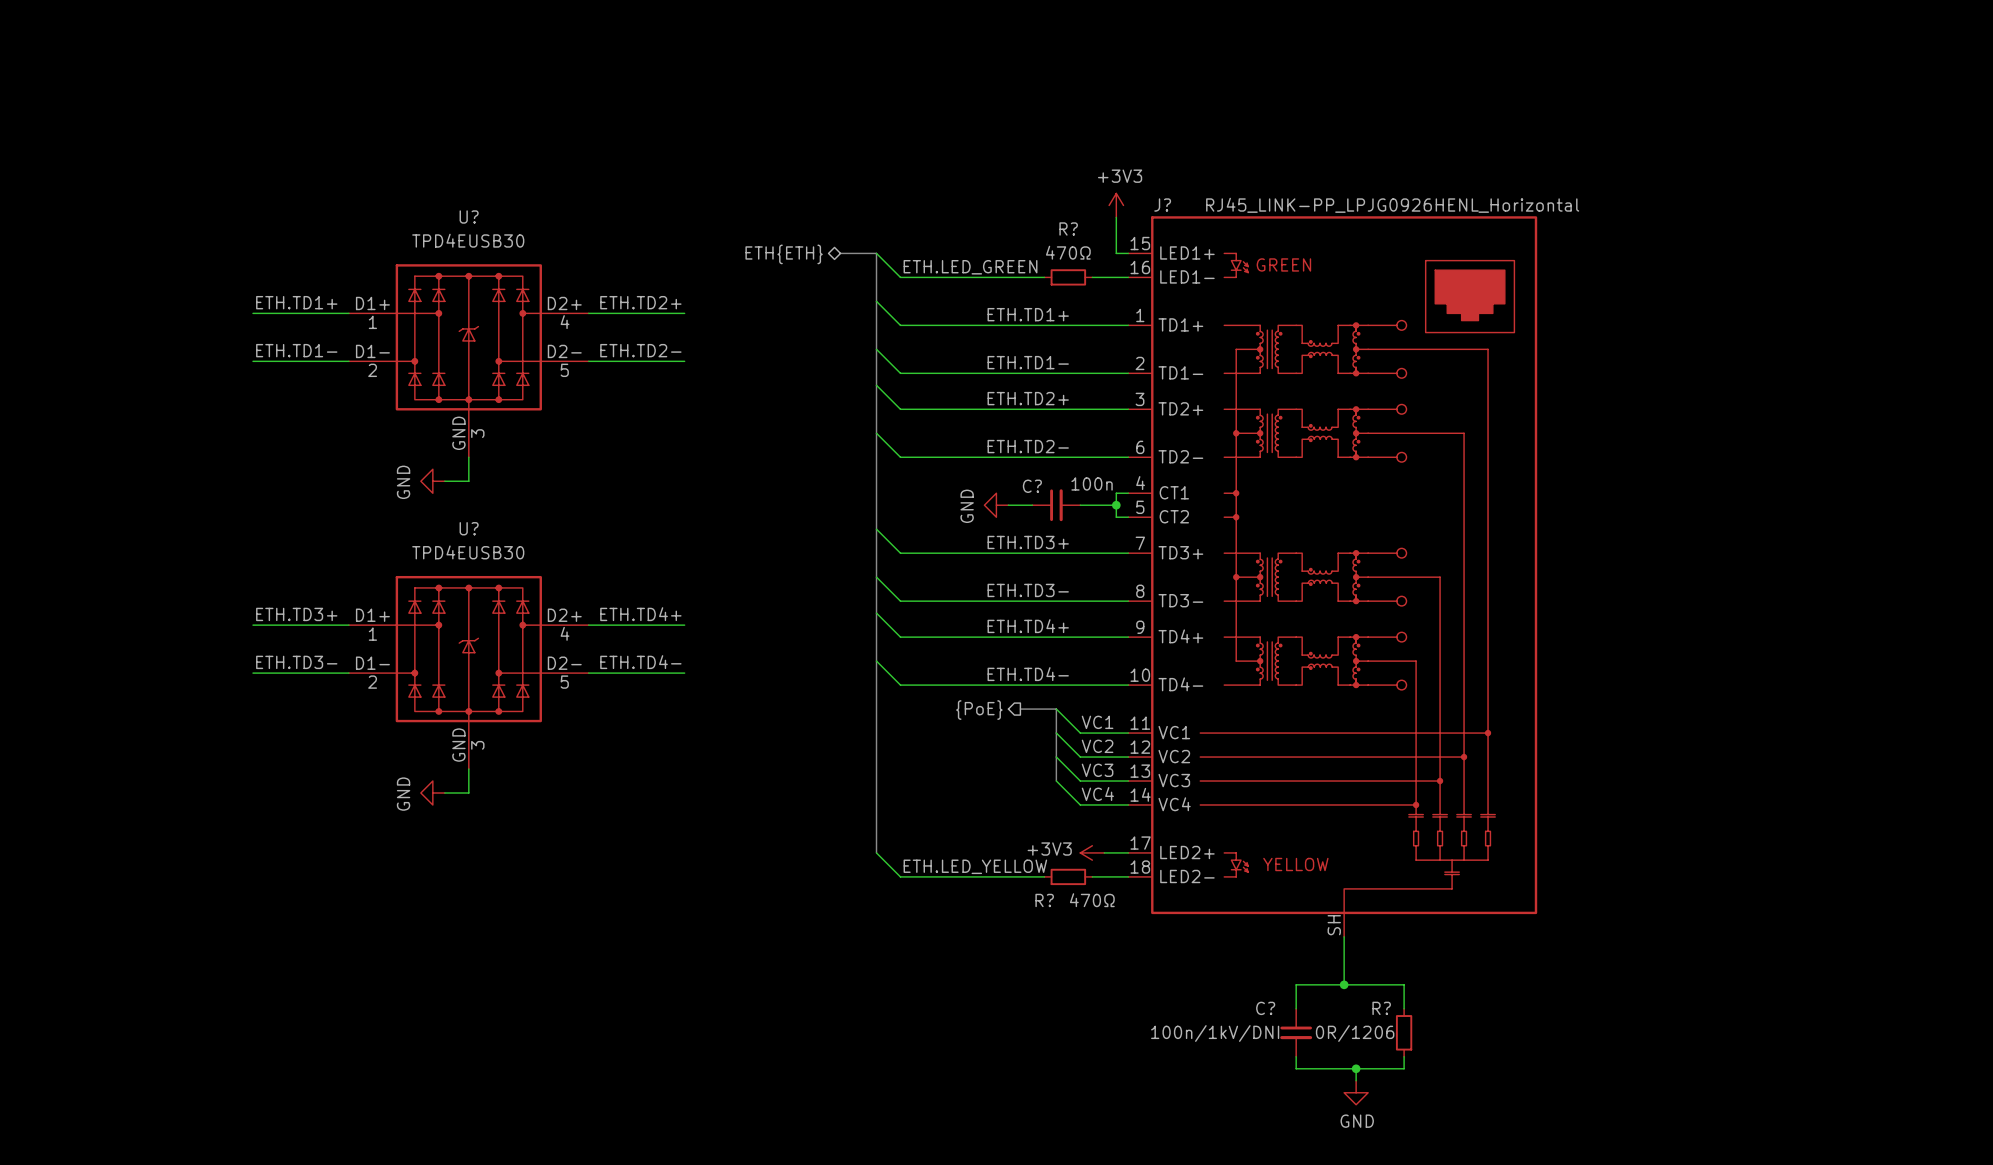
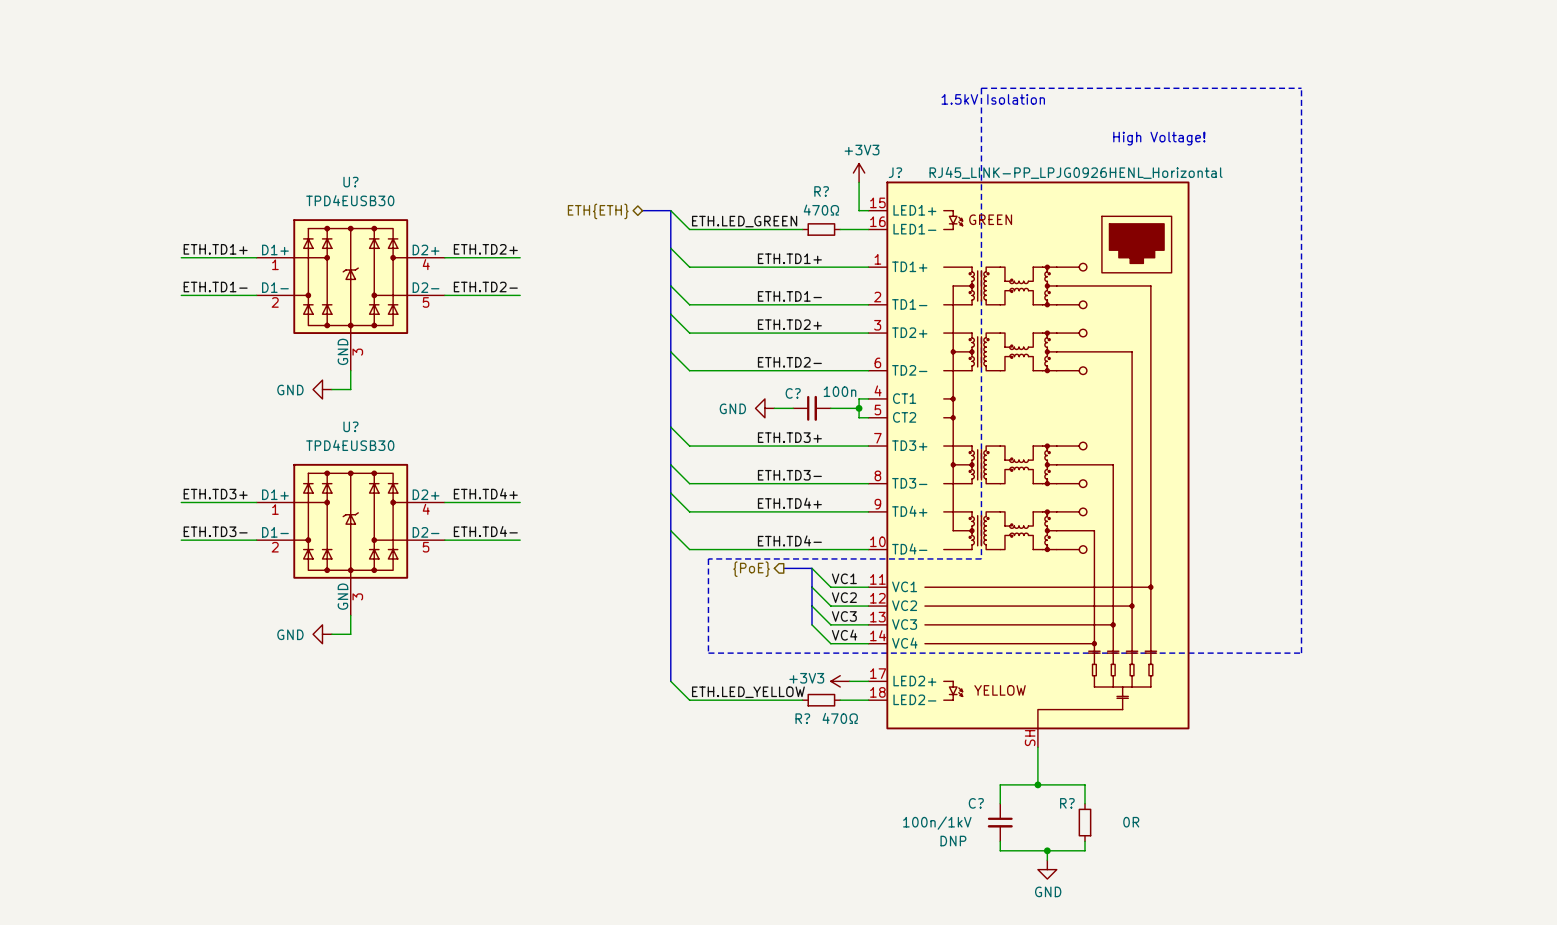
line: none -> (981, 88) (981, 558) (708, 558) (708, 653) (1301, 653) (1301, 88) (981, 88)
text: none -> 1.5kV Isolation (993, 99)
text: none -> High Voltage! (1159, 138)
power symbol text rotation: 0° (403, 482) -> 90° clockwise (290, 390)
power symbol text rotation: 0° (967, 506) -> 90° clockwise (732, 408)
power symbol text rotation: 0° (403, 794) -> 90° clockwise (290, 634)
C? value: 100n/1kV/DNI (1215, 1033) -> 100n/1kV (937, 823)
R? value: 0R/1206 (1355, 1033) -> 0R (1131, 822)
C? text: none -> DNP (953, 841)

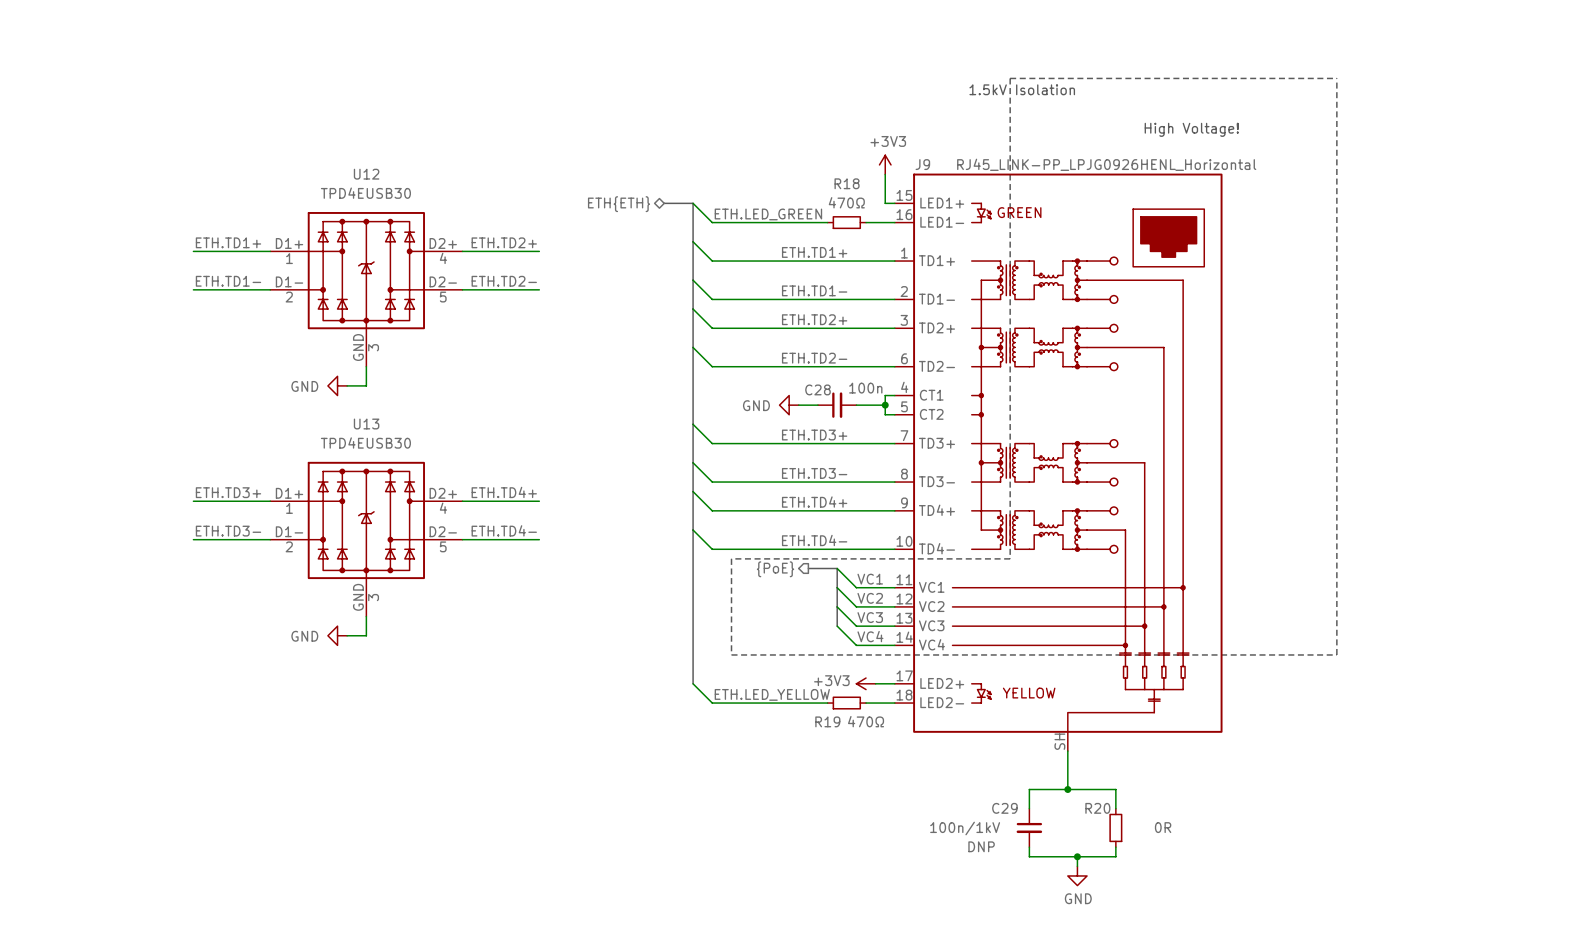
J? name: J? (895, 172) -> J9 (922, 164)
U? name: U? (350, 182) -> U12 (366, 174)
R? name: R? (821, 191) -> R18 (847, 183)
C? name: C? (793, 393) -> C28 (817, 389)
U? name: U? (350, 426) -> U13 (366, 424)
R? name: R? (802, 718) -> R19 (827, 721)
C? name: C? (976, 803) -> C29 (1004, 808)
R? name: R? (1067, 803) -> R20 (1097, 808)

